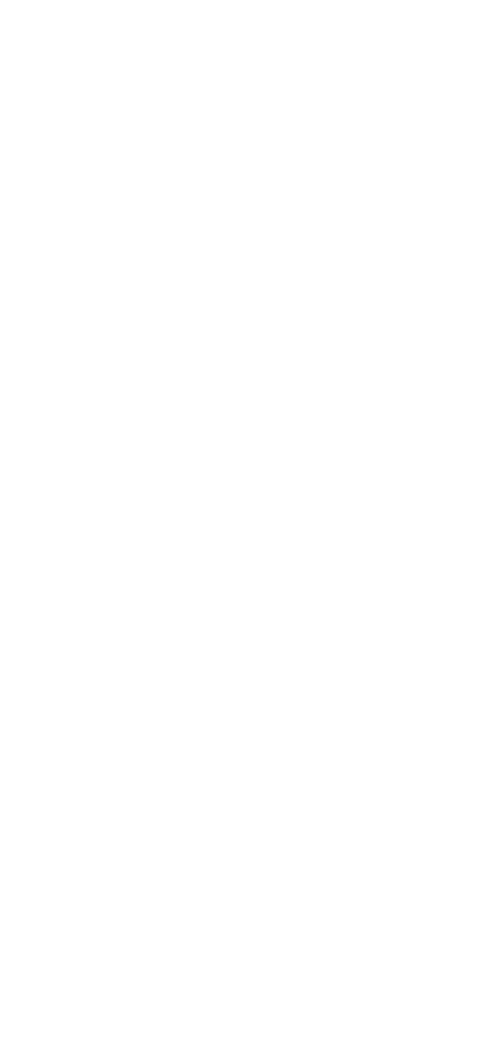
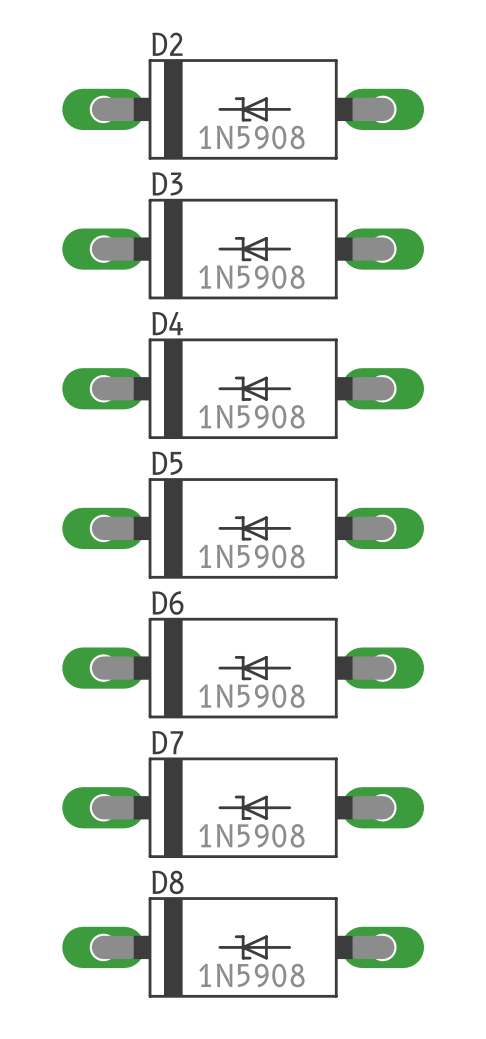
D2: none -> 1N5908 (243, 109)
D3: none -> 1N5908 (243, 249)
D4: none -> 1N5908 (243, 388)
D5: none -> 1N5908 (243, 528)
D6: none -> 1N5908 (243, 668)
D7: none -> 1N5908 (243, 807)
D8: none -> 1N5908 (243, 947)

